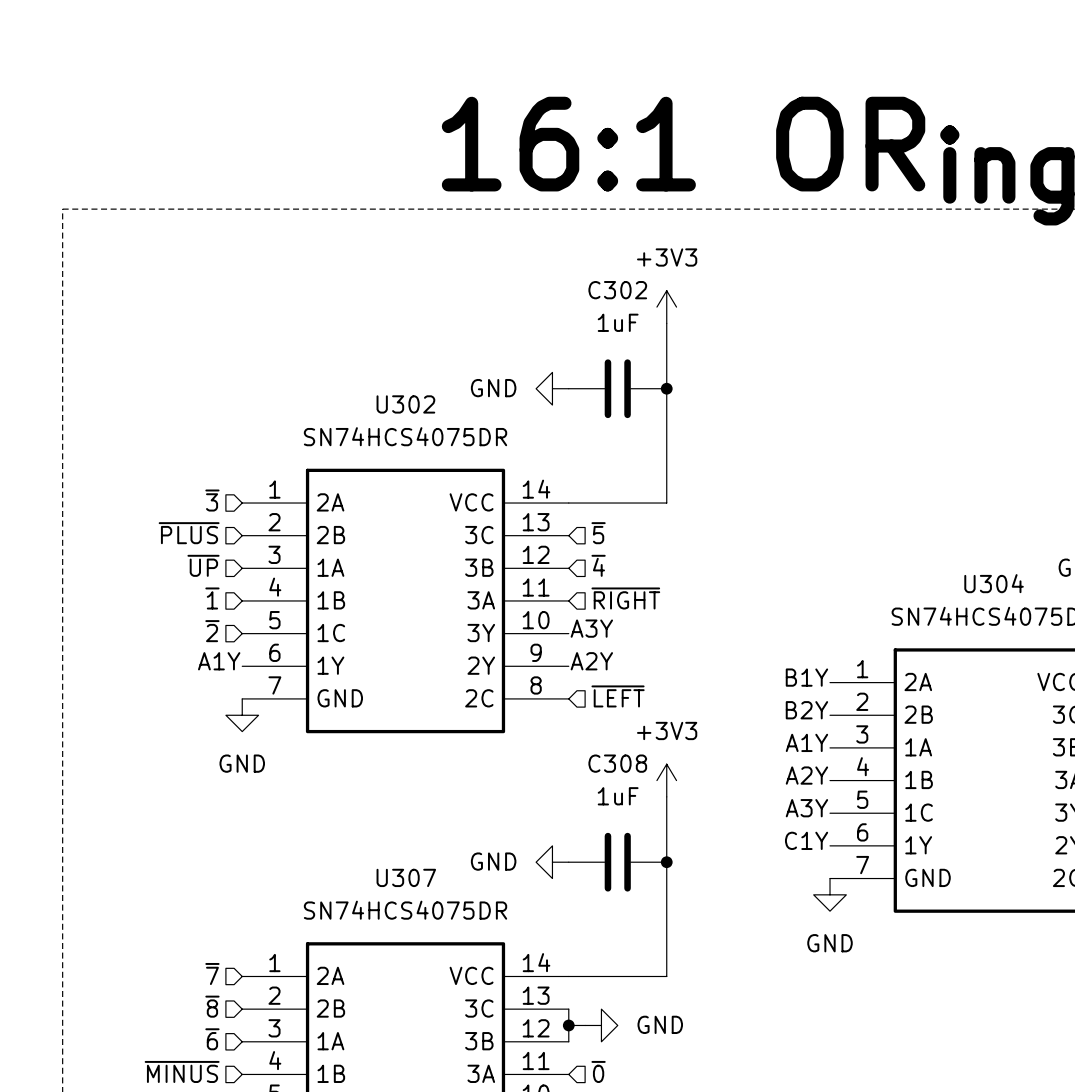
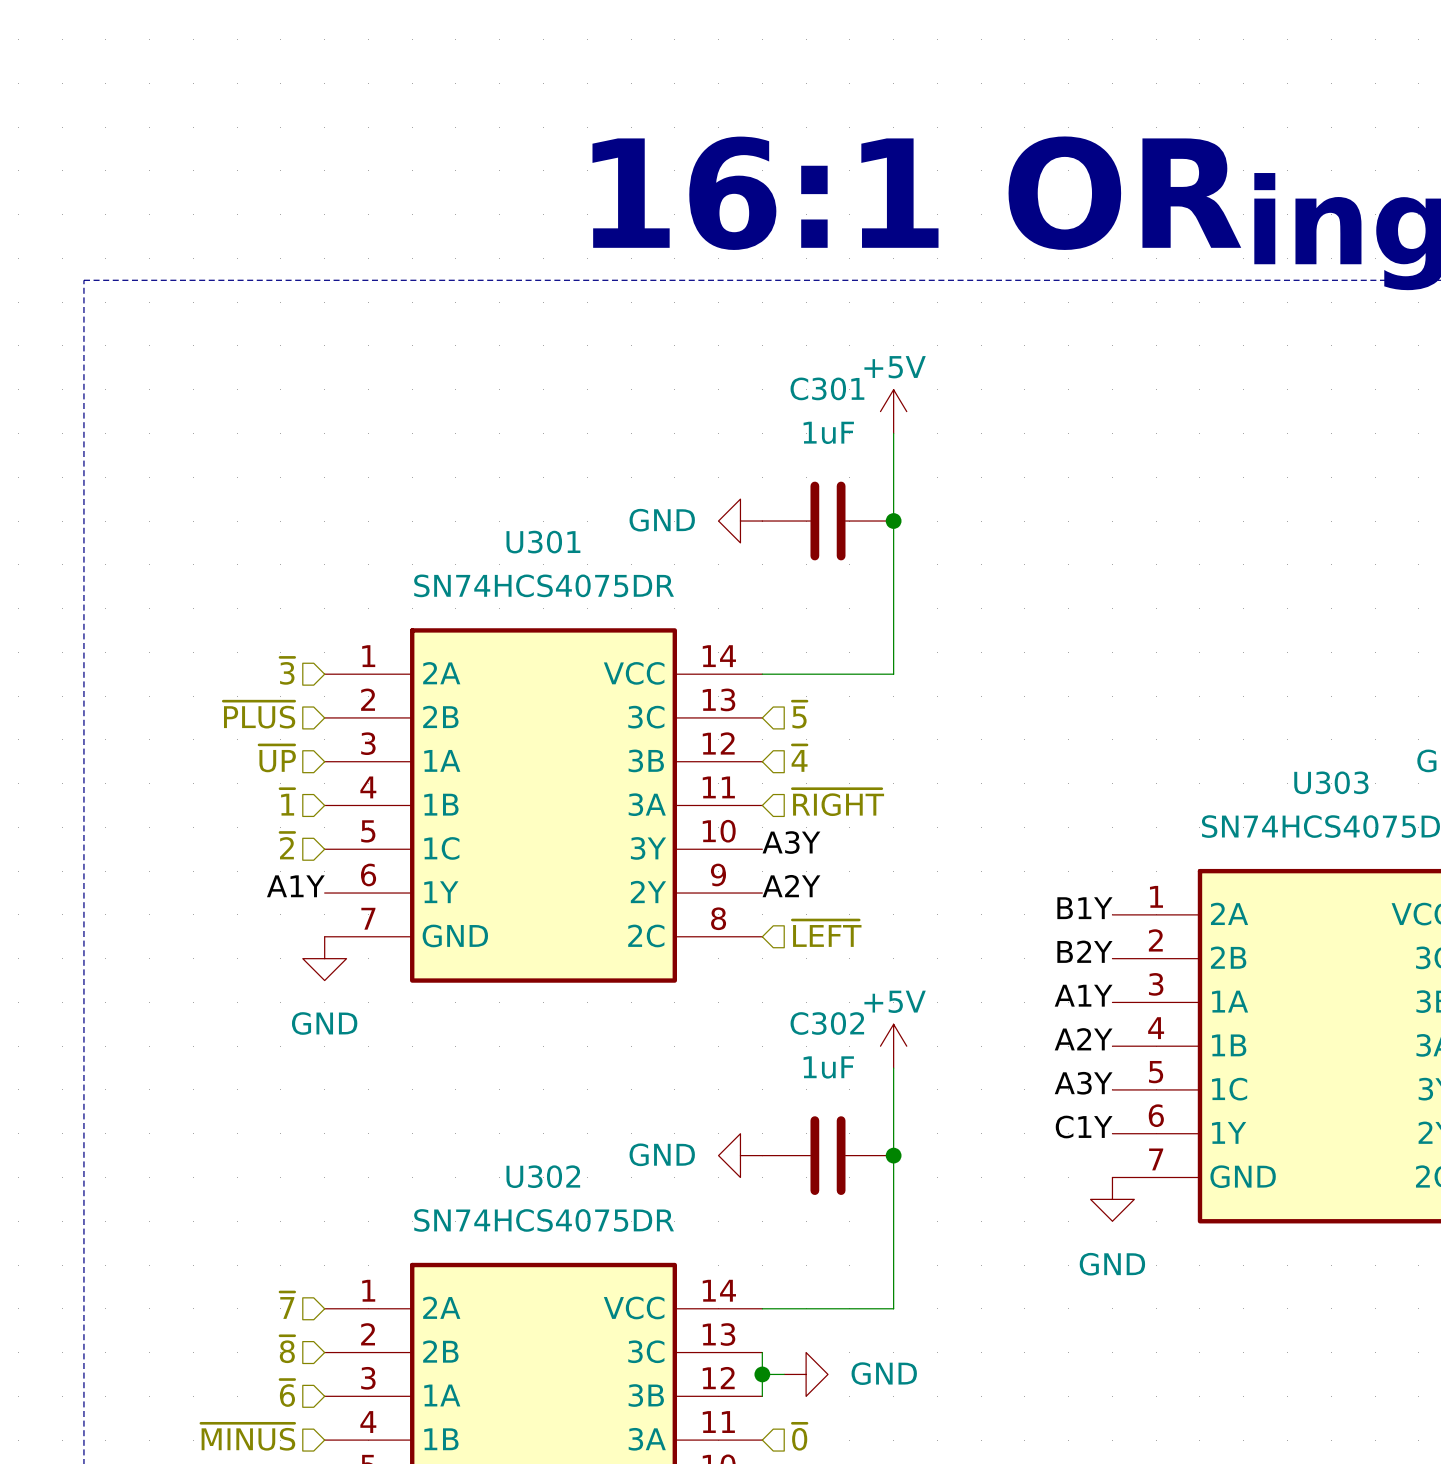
C302 name: C302 (617, 290) -> C301 (827, 388)
power symbol: +3V3 (666, 307) -> +5V (893, 411)
U302 name: U302 (405, 404) -> U301 (543, 542)
U304 name: U304 (994, 583) -> U303 (1331, 782)
C308 name: C308 (617, 763) -> C302 (827, 1023)
power symbol: +3V3 (666, 780) -> +5V (893, 1046)
U307 name: U307 (406, 877) -> U302 (543, 1176)

